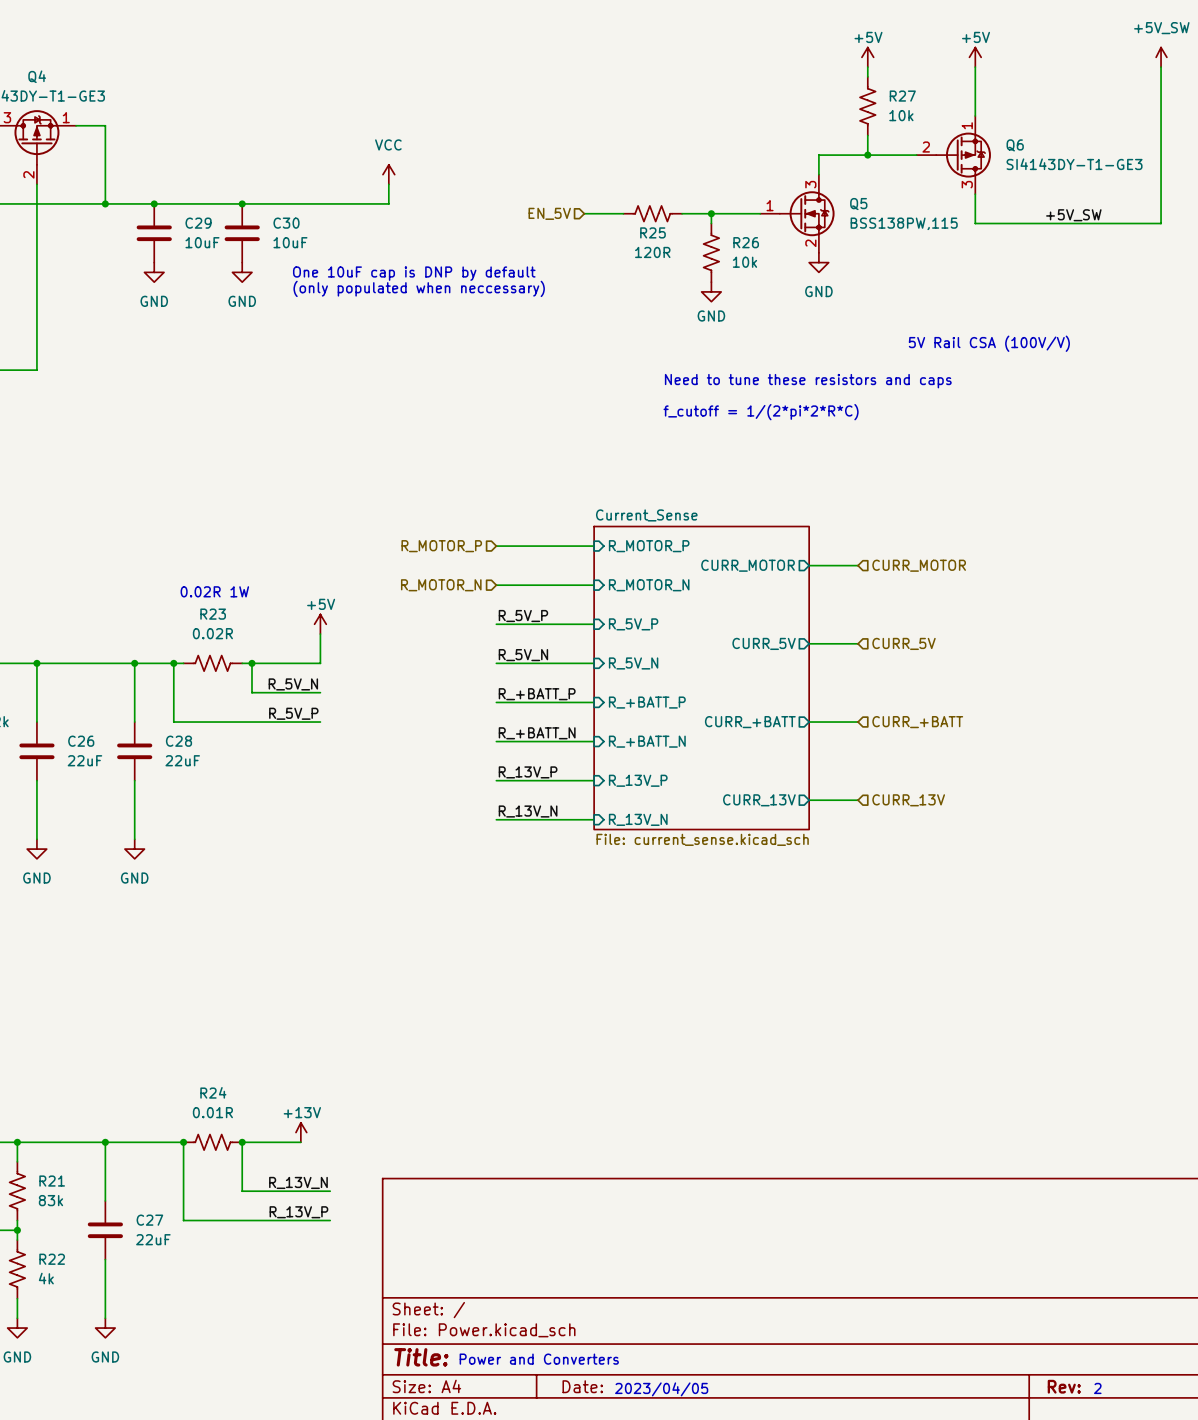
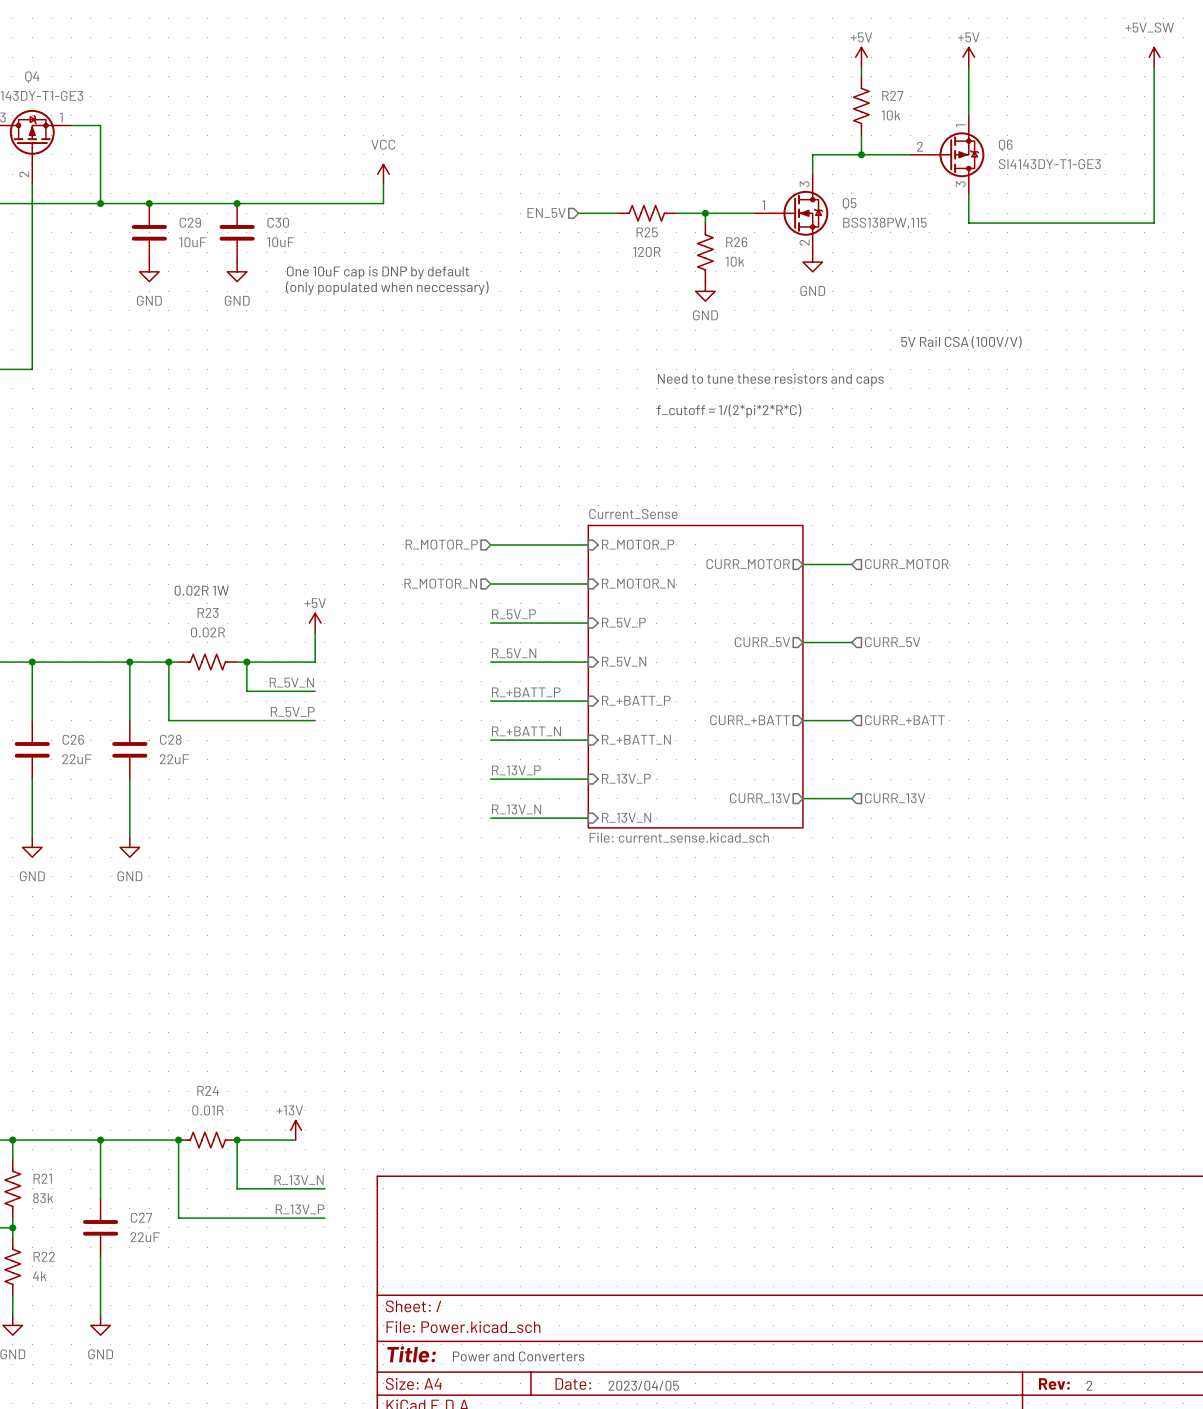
label: +5V_SW (1073, 215) -> none

